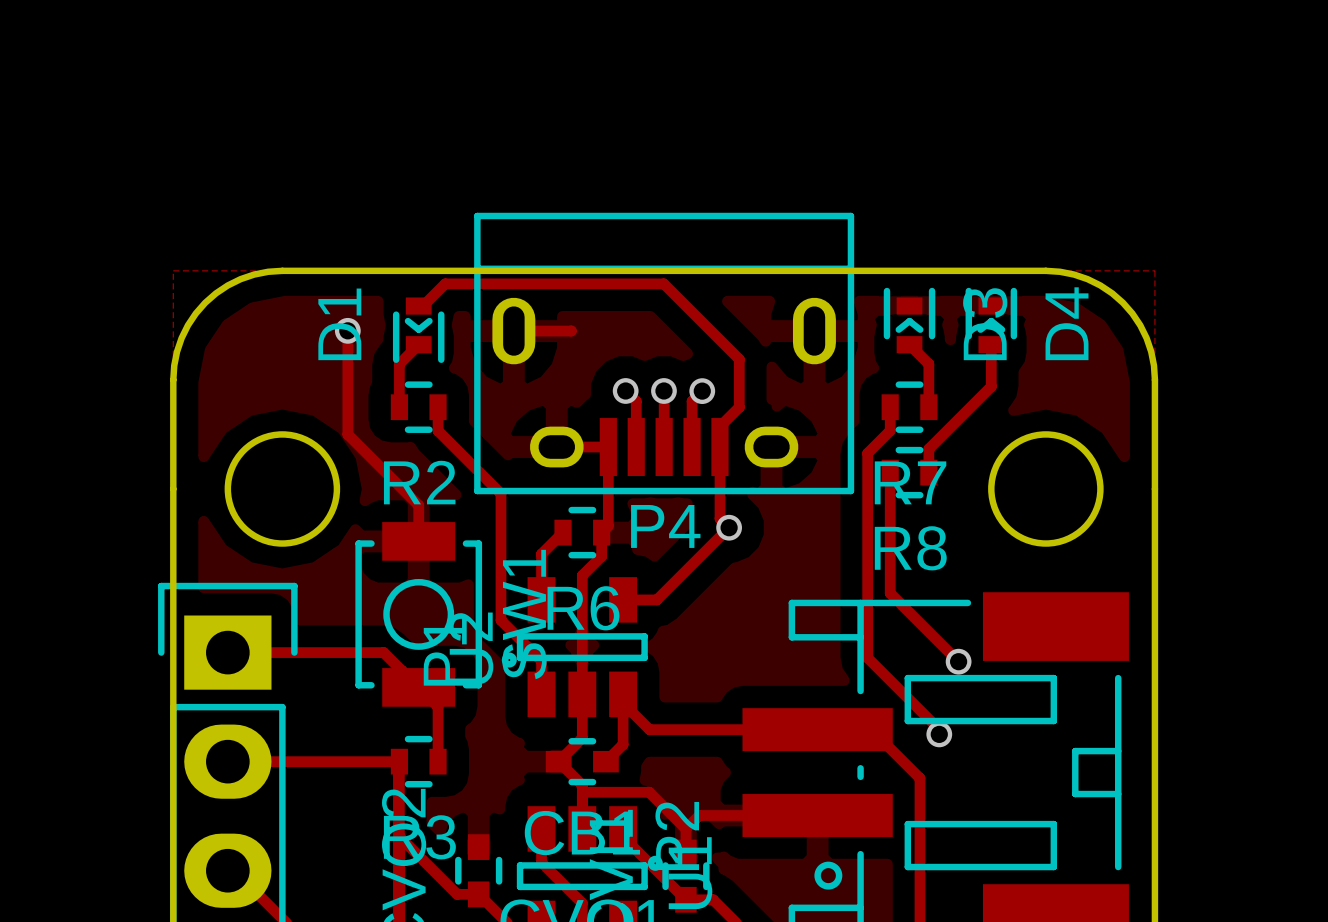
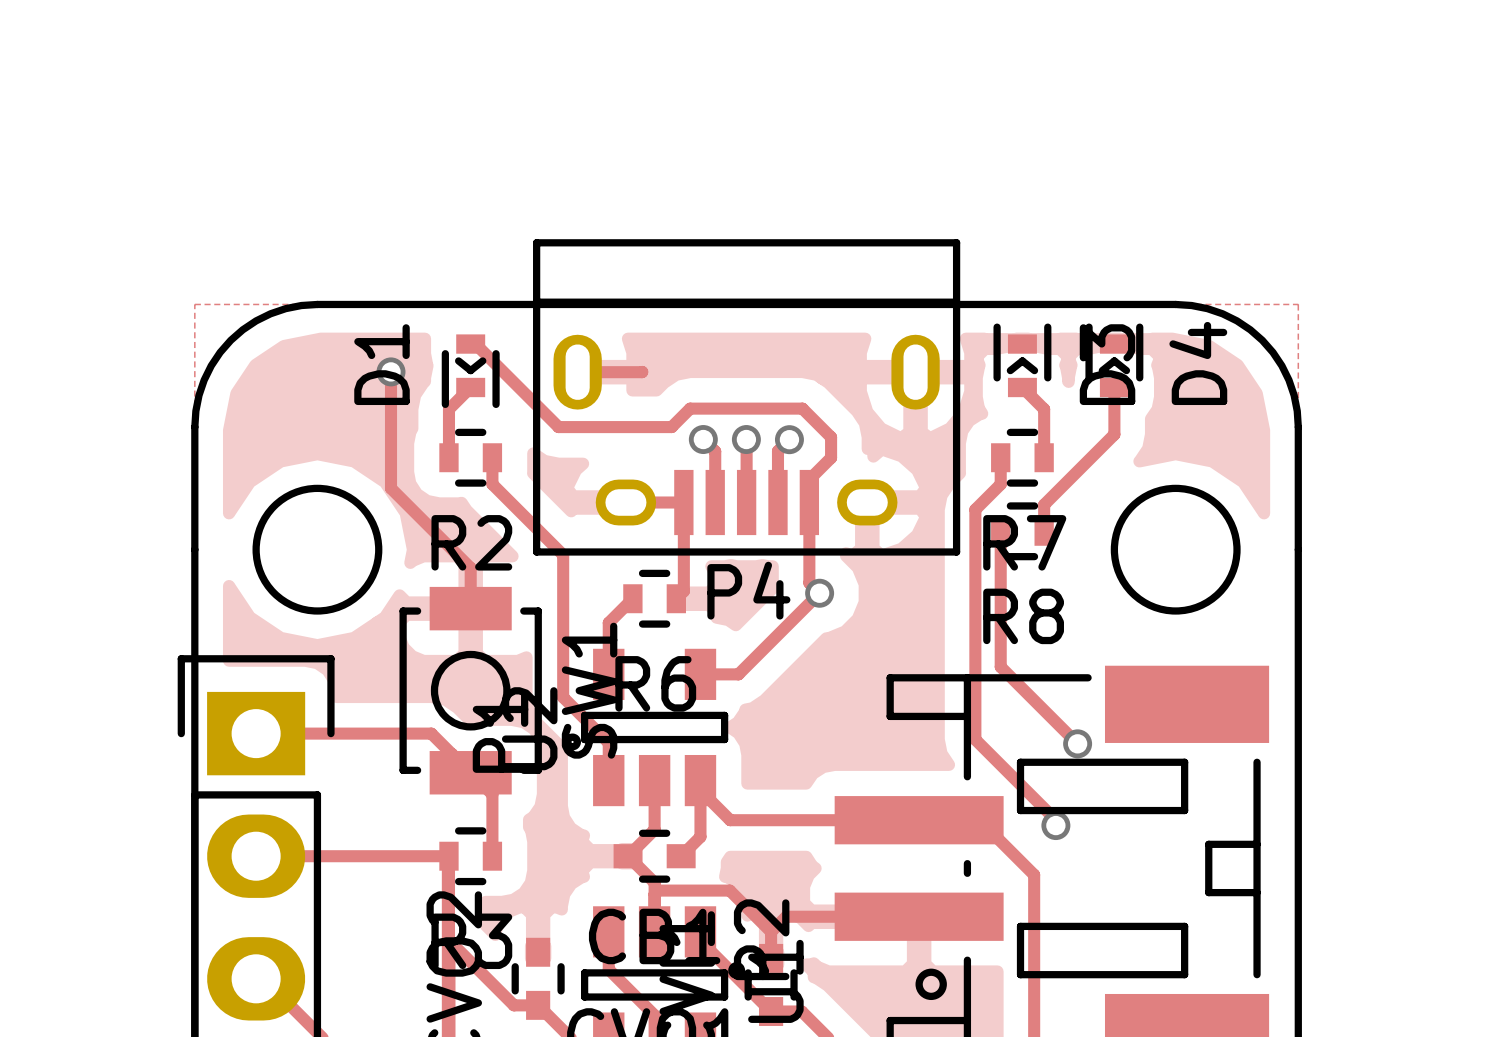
track: (423, 306) (445, 283) (663, 283) (739, 359) (739, 388) -> (475, 344) (558, 427) (671, 427) (690, 408) (802, 408) (831, 437)
track: (601, 532) (601, 556) (582, 575) (582, 694) -> none

